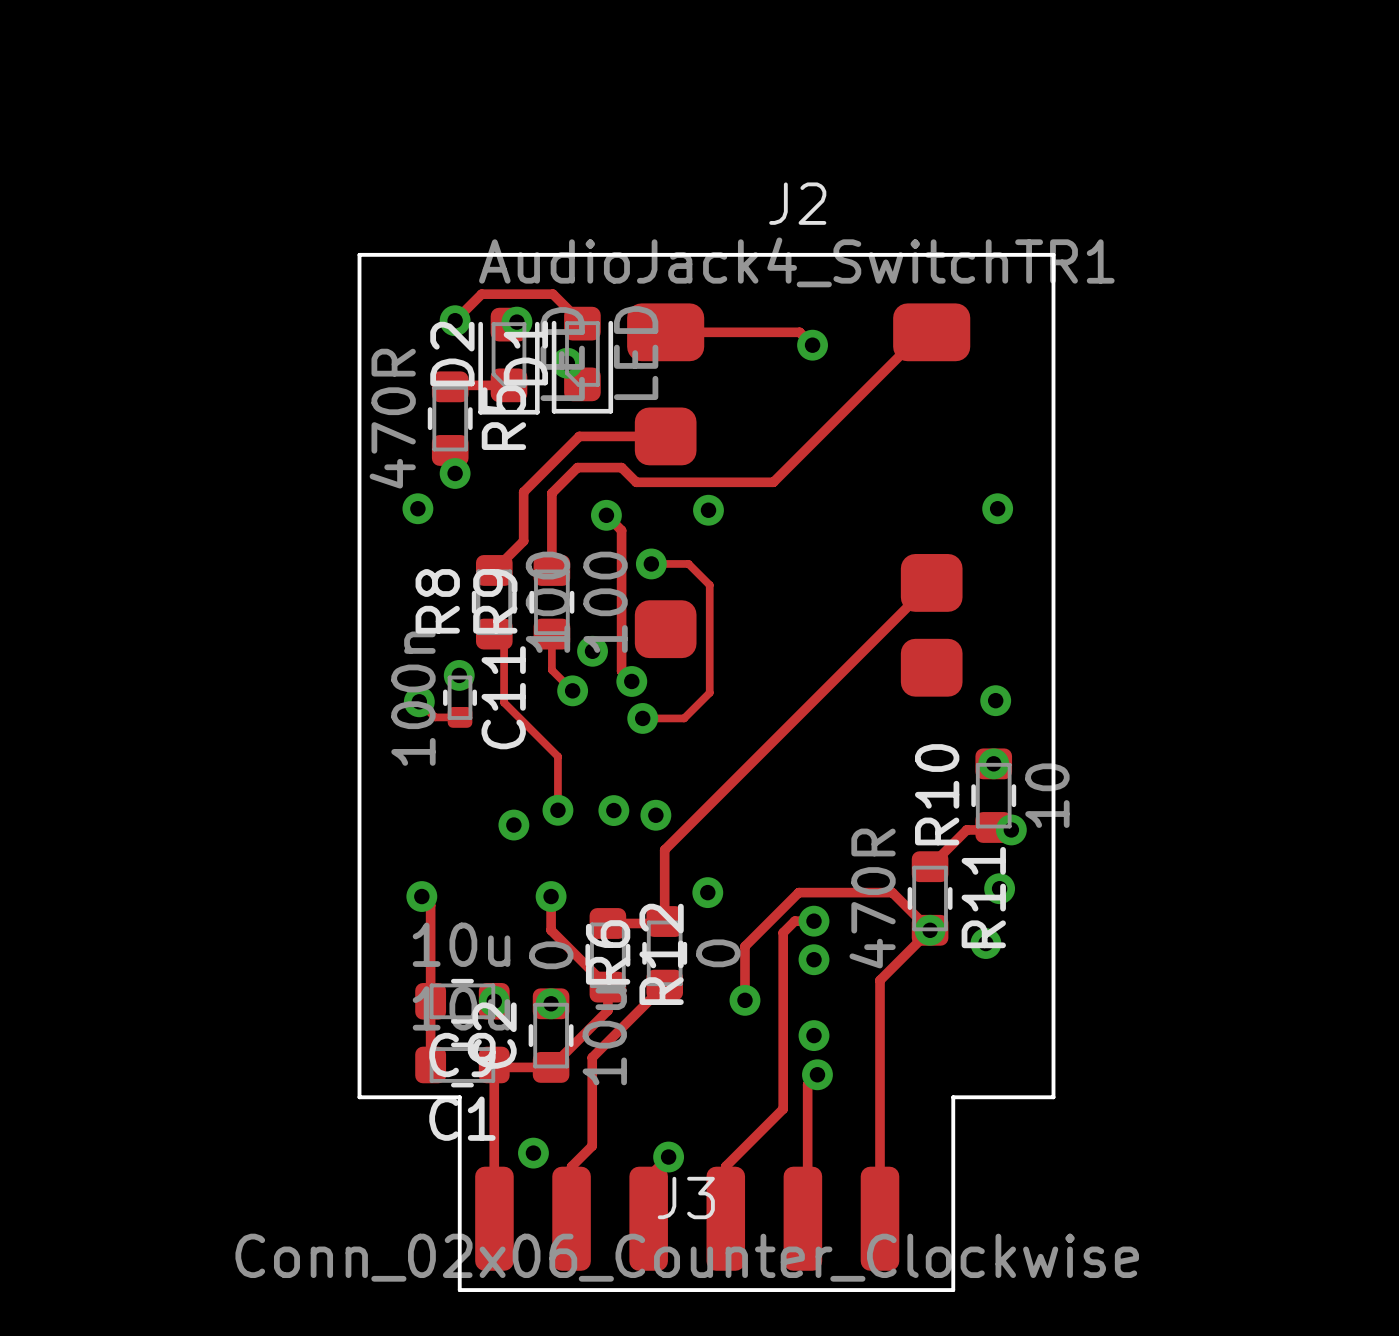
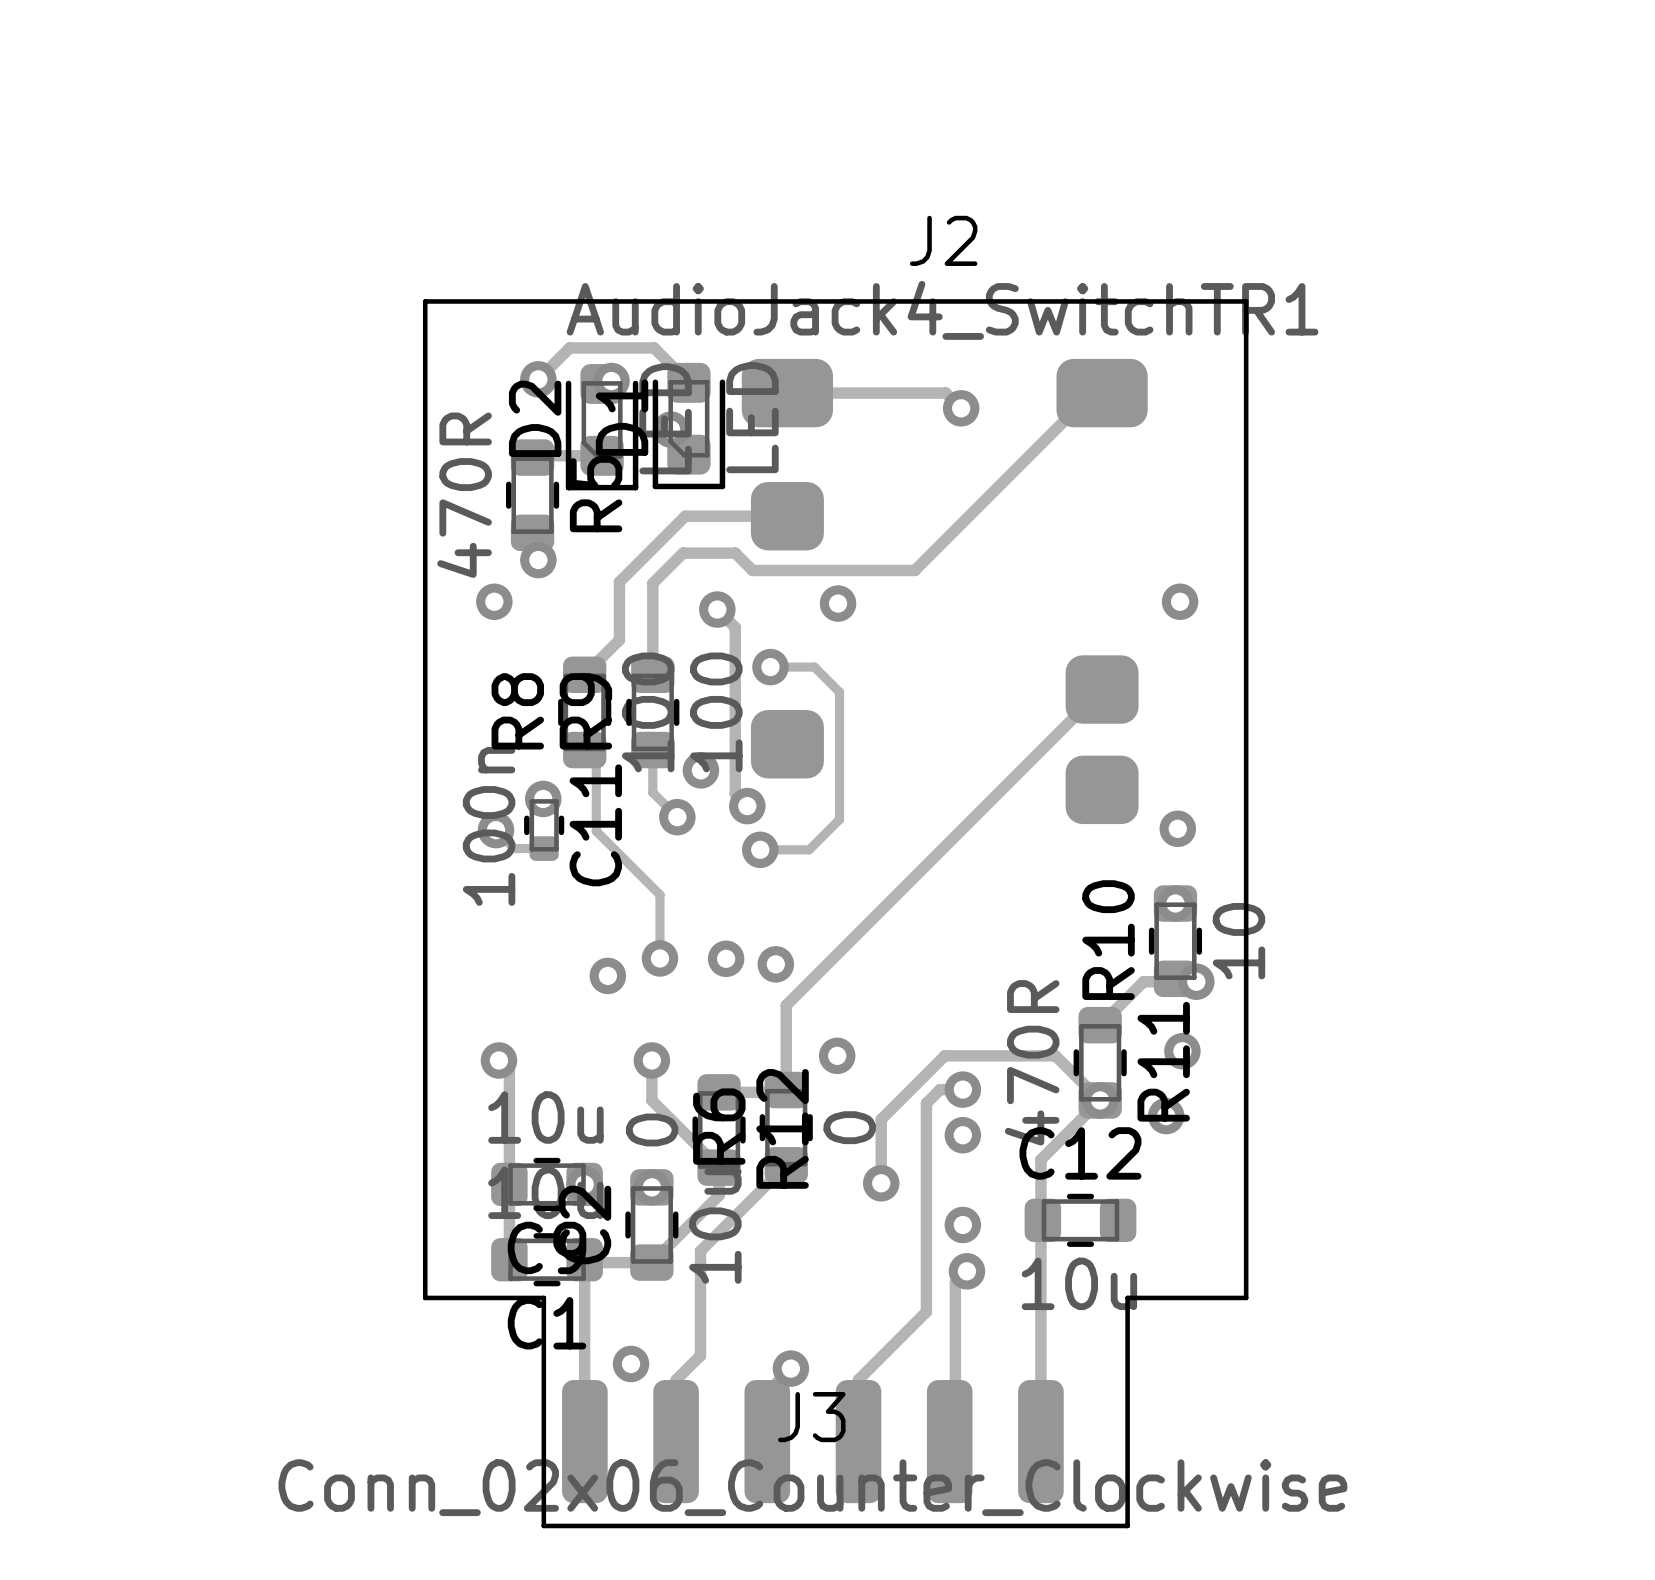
C12: none -> 10u (1080, 1220)

